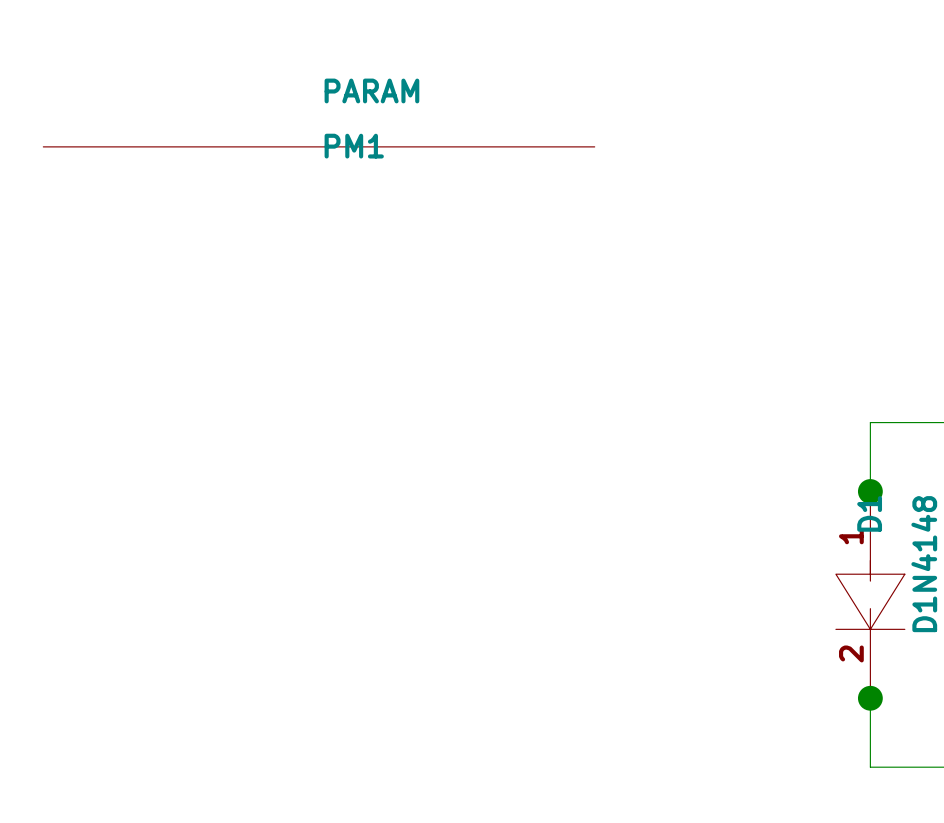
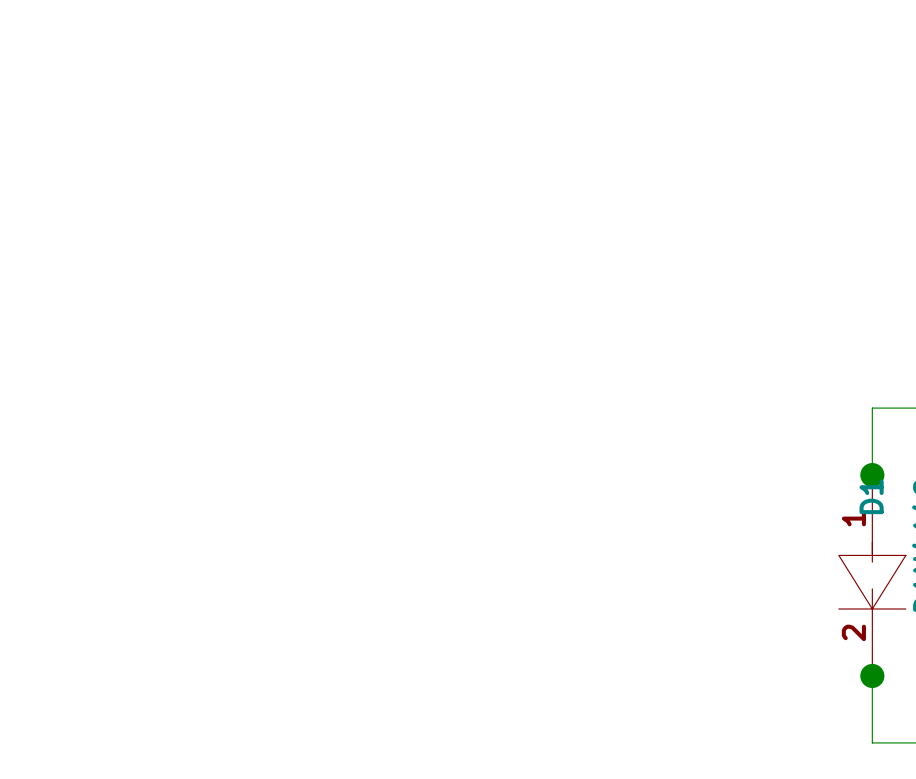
PM1: PARAM (319, 146) -> none

